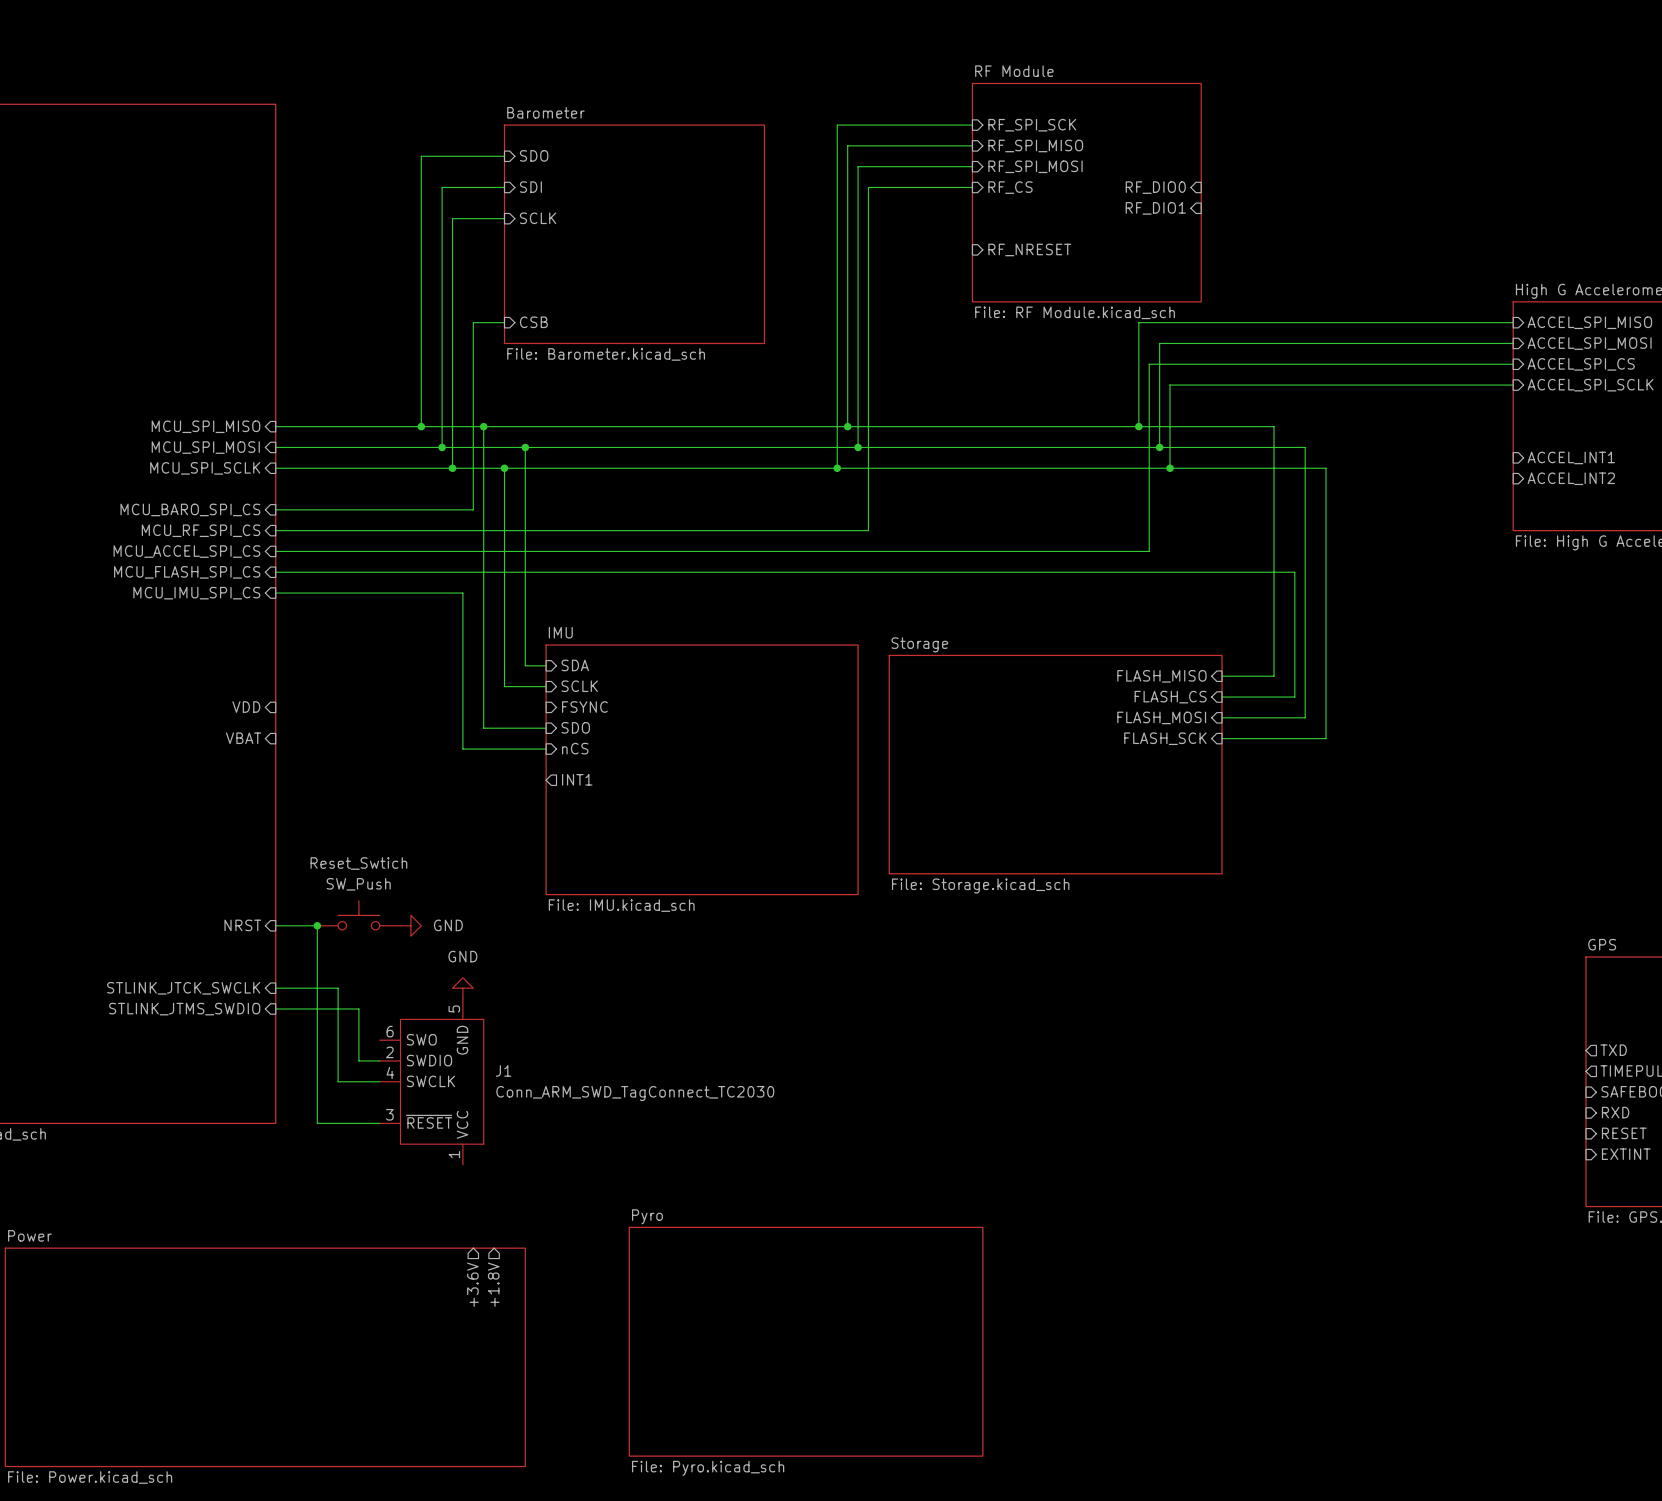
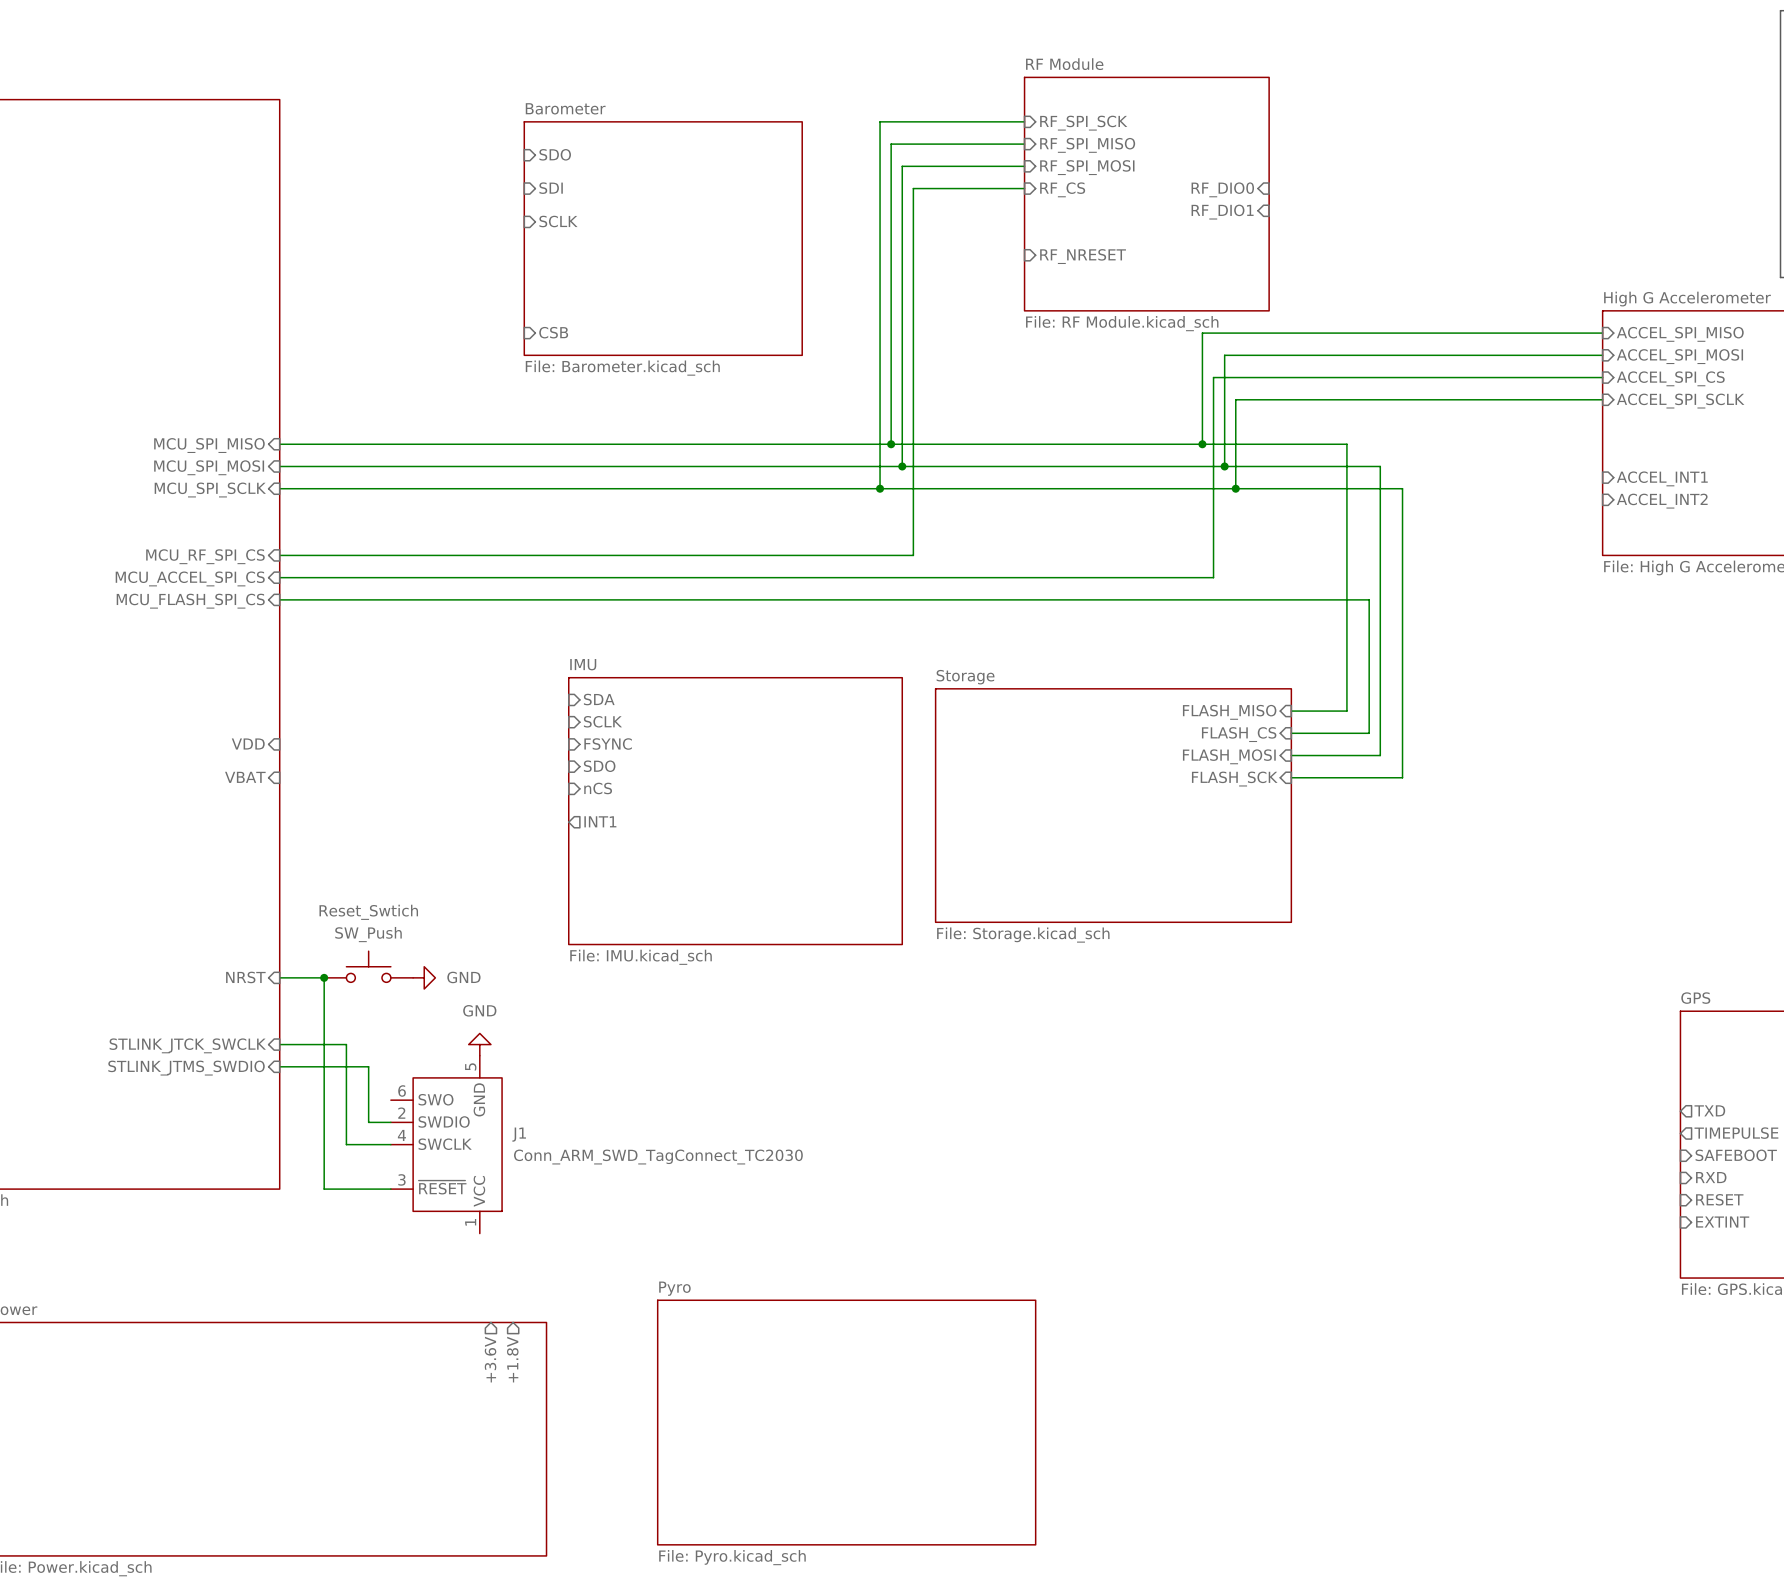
wire: (504, 156) (421, 156) (421, 426) -> none
wire: (504, 187) (442, 187) (442, 447) -> none
wire: (504, 218) (452, 218) (452, 468) -> none
wire: (504, 322) (473, 322) (473, 509) (275, 509) -> none
junction: (421, 426) -> none
wire: (483, 426) (483, 728) (546, 728) -> none
junction: (483, 426) -> none
junction: (442, 447) -> none
wire: (525, 447) (525, 665) (546, 665) -> none
junction: (525, 447) -> none
junction: (452, 468) -> none
wire: (504, 468) (504, 686) (546, 686) -> none
junction: (504, 468) -> none
sheet pin: MCU_BARO_SPI_CS (190, 509) -> none
sheet pin: MCU_IMU_SPI_CS (196, 593) -> none
wire: (275, 593) (462, 593) (462, 749) (546, 749) -> none

